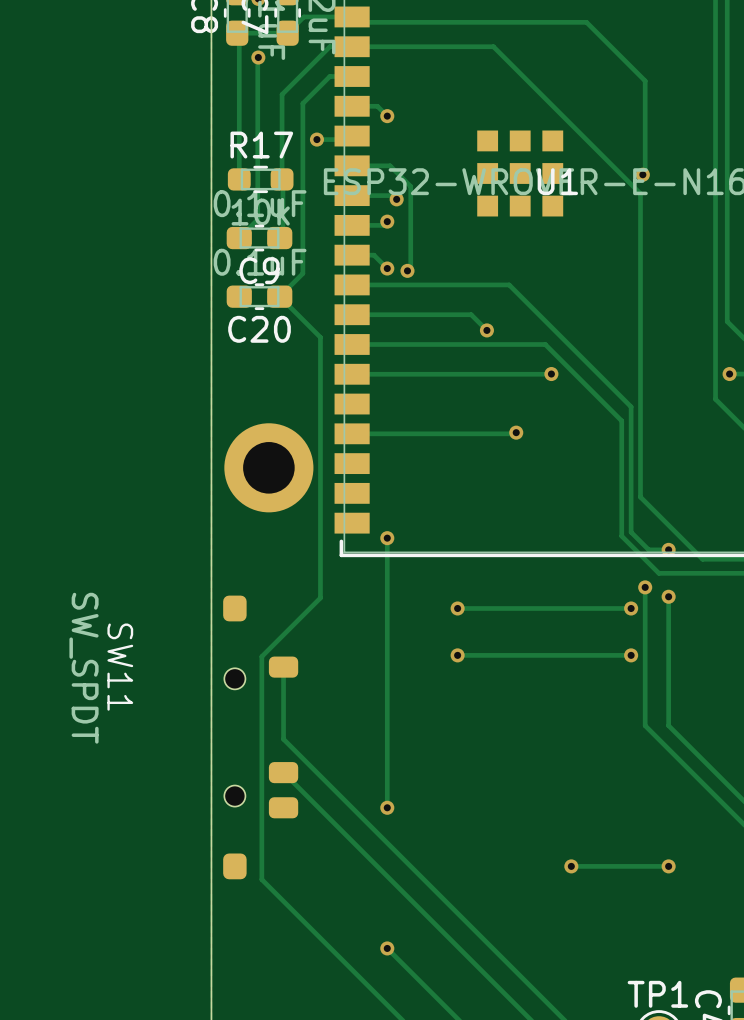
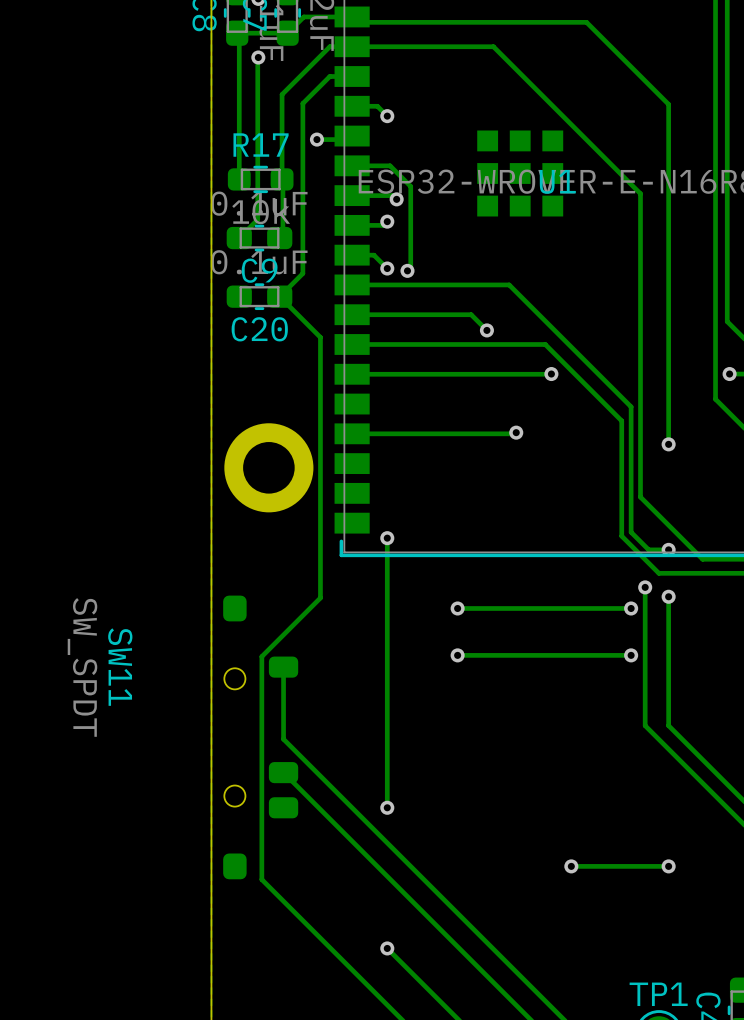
track: (645, 80) (645, 172) (642, 174) -> (645, 80) (668, 104) (668, 444)
via: (642, 174) -> none
via: none -> (668, 444)

